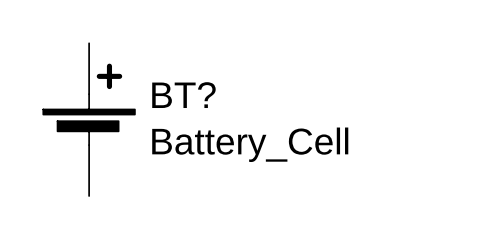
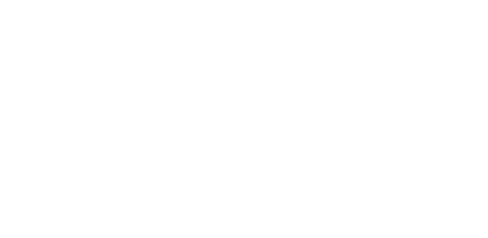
BT?: Battery_Cell (89, 119) -> none

